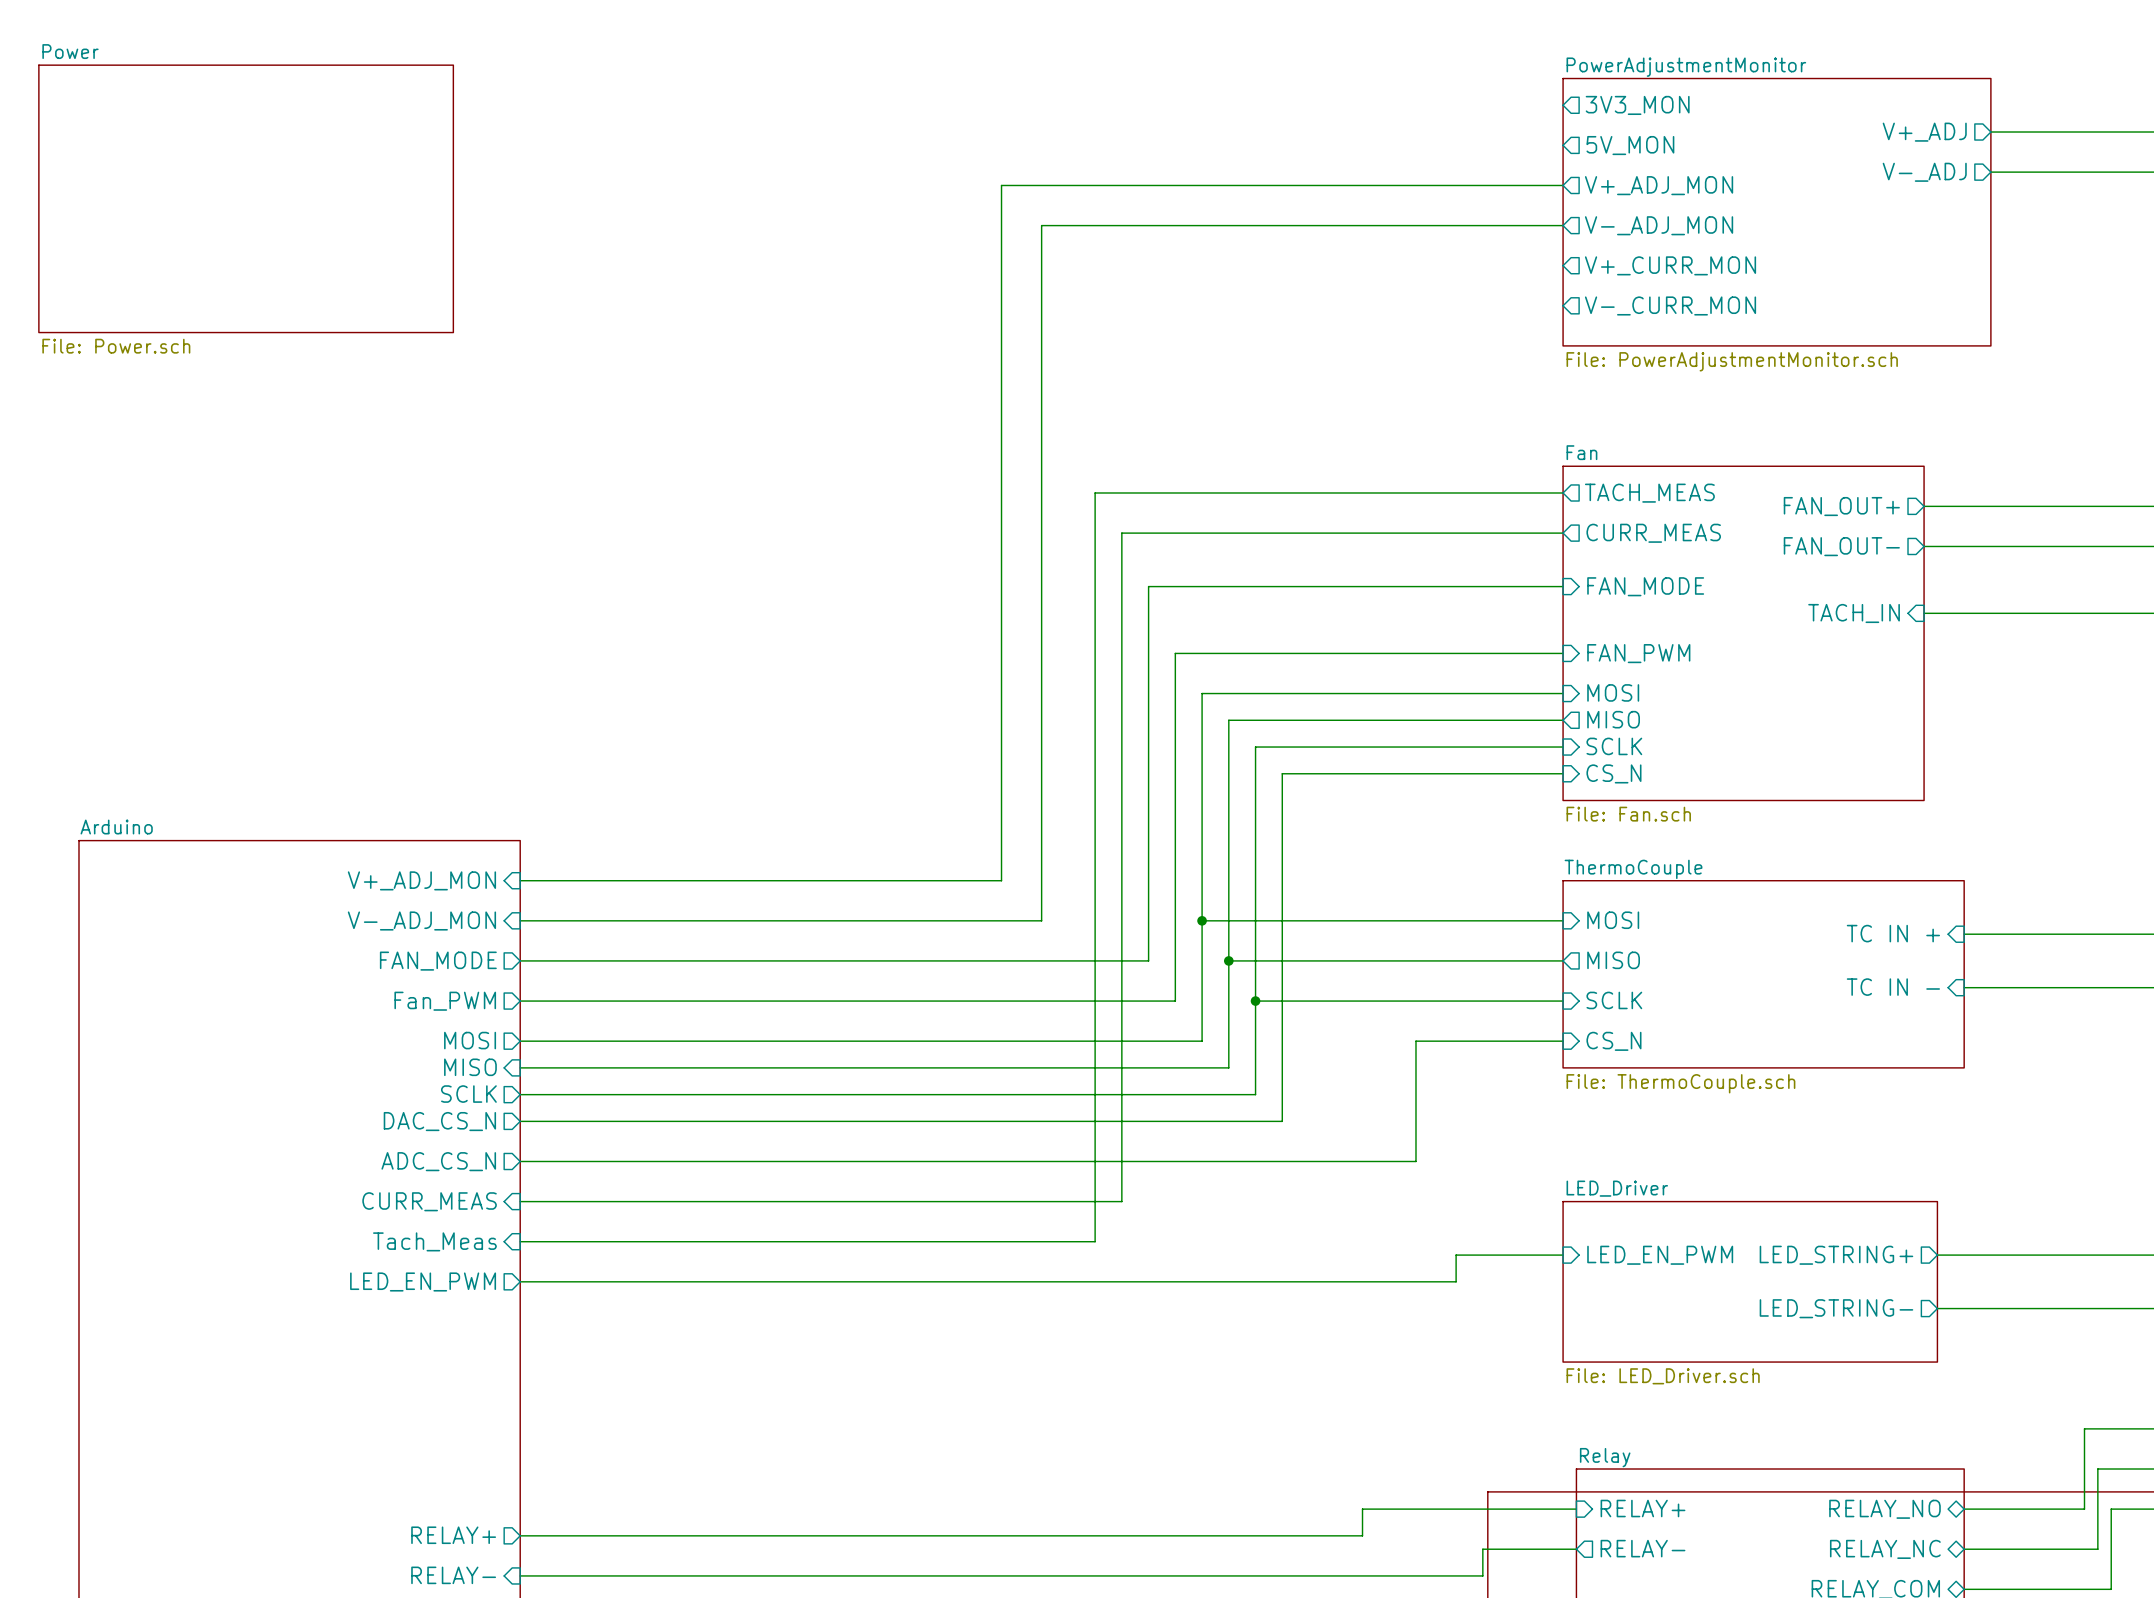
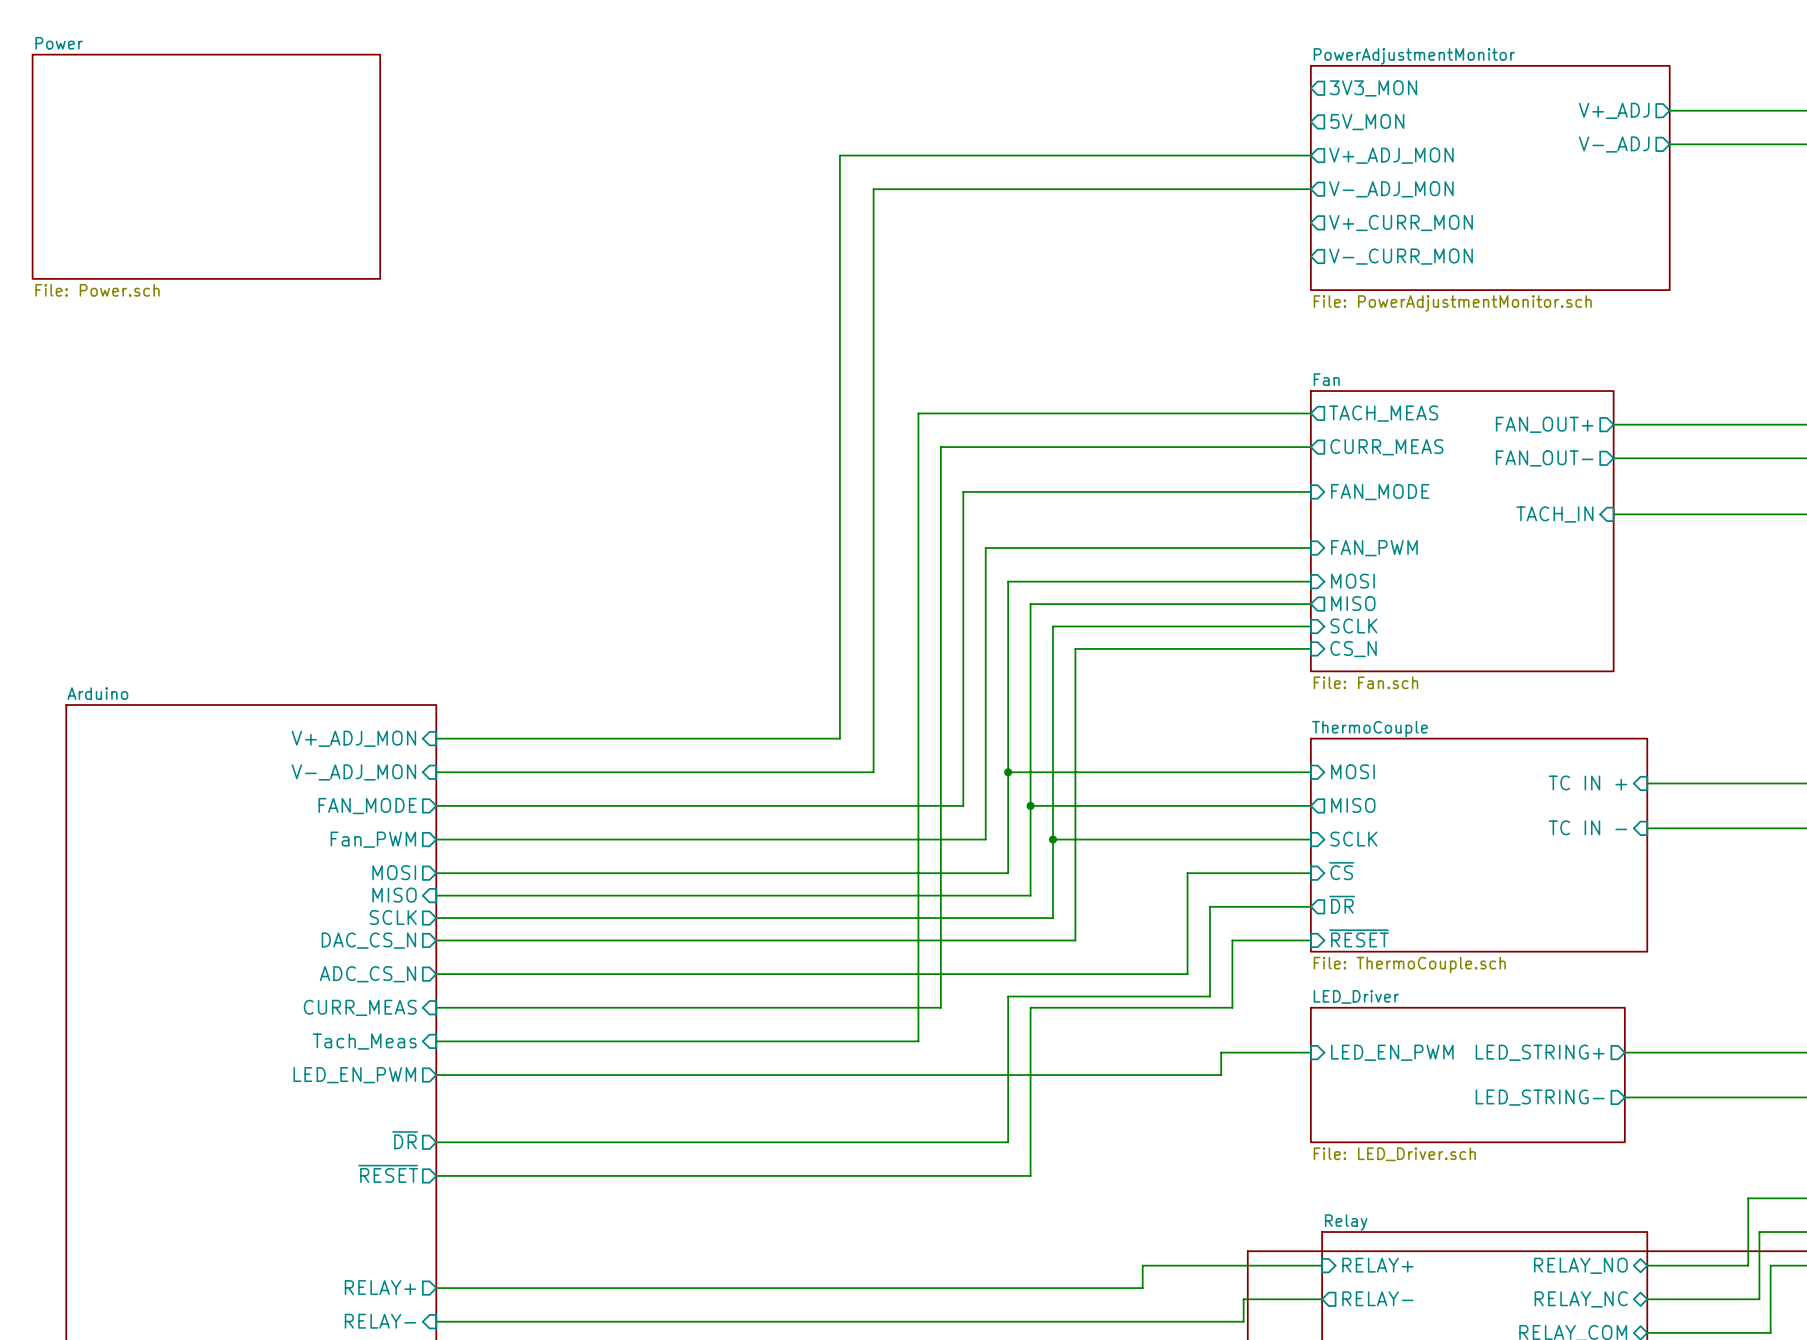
sheet ThermoCouple: File: ThermoCouple.sch (1763, 974) -> none
sheet ThermoCouple: none -> File: ThermoCouple.sch (1479, 845)
sheet pin: CS_N (1613, 1041) -> ~{CS} (1341, 871)
sheet pin: none -> ~{DR} (1342, 904)
wire: none -> (1310, 906) (1209, 906) (1209, 996) (1008, 996) (1008, 1142) (436, 1142)
sheet pin: none -> ~{RESET} (1359, 938)
wire: none -> (1310, 940) (1232, 940) (1232, 1007) (1030, 1007) (1030, 1175) (436, 1175)
sheet pin: none -> ~{DR} (405, 1140)
sheet pin: none -> ~{RESET} (388, 1173)

